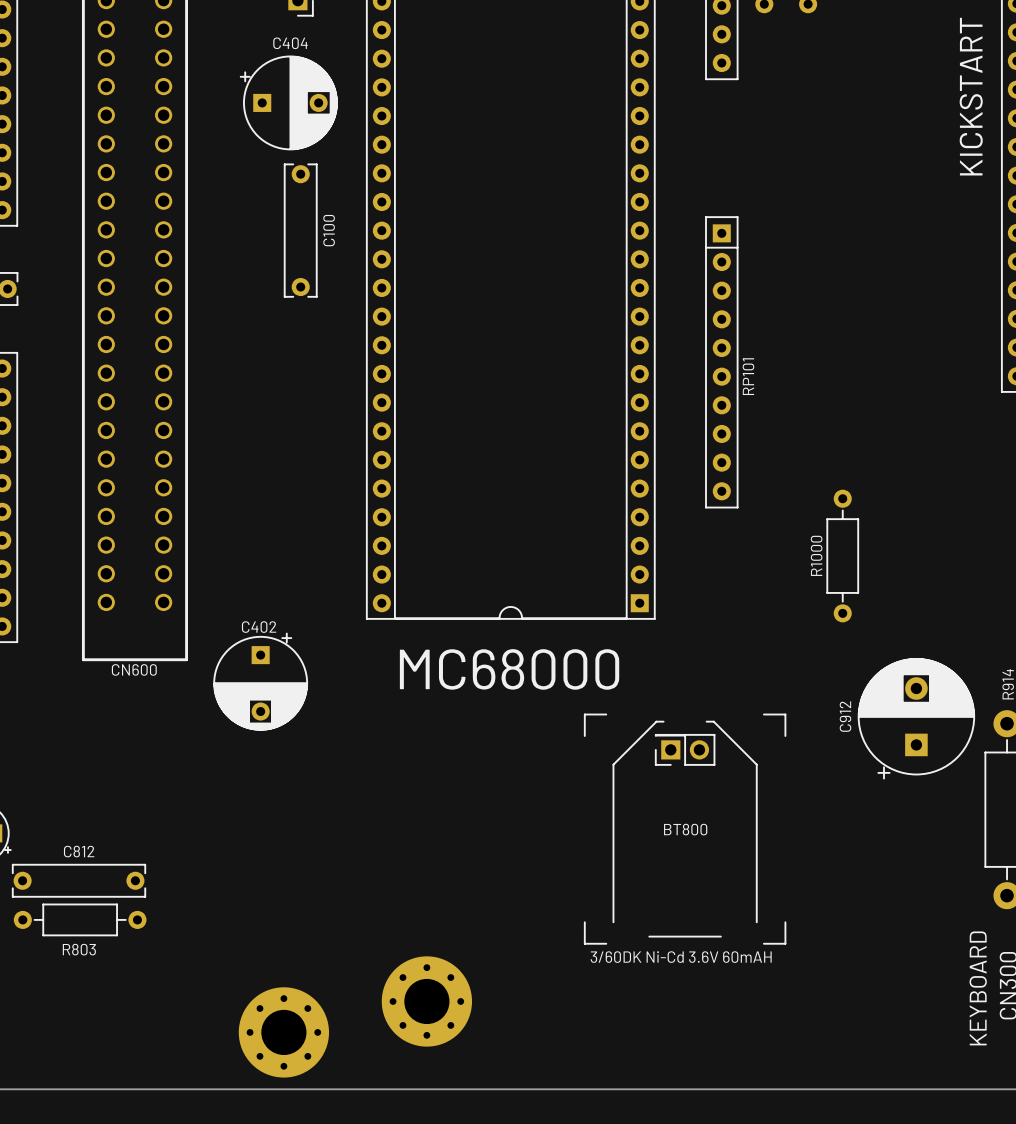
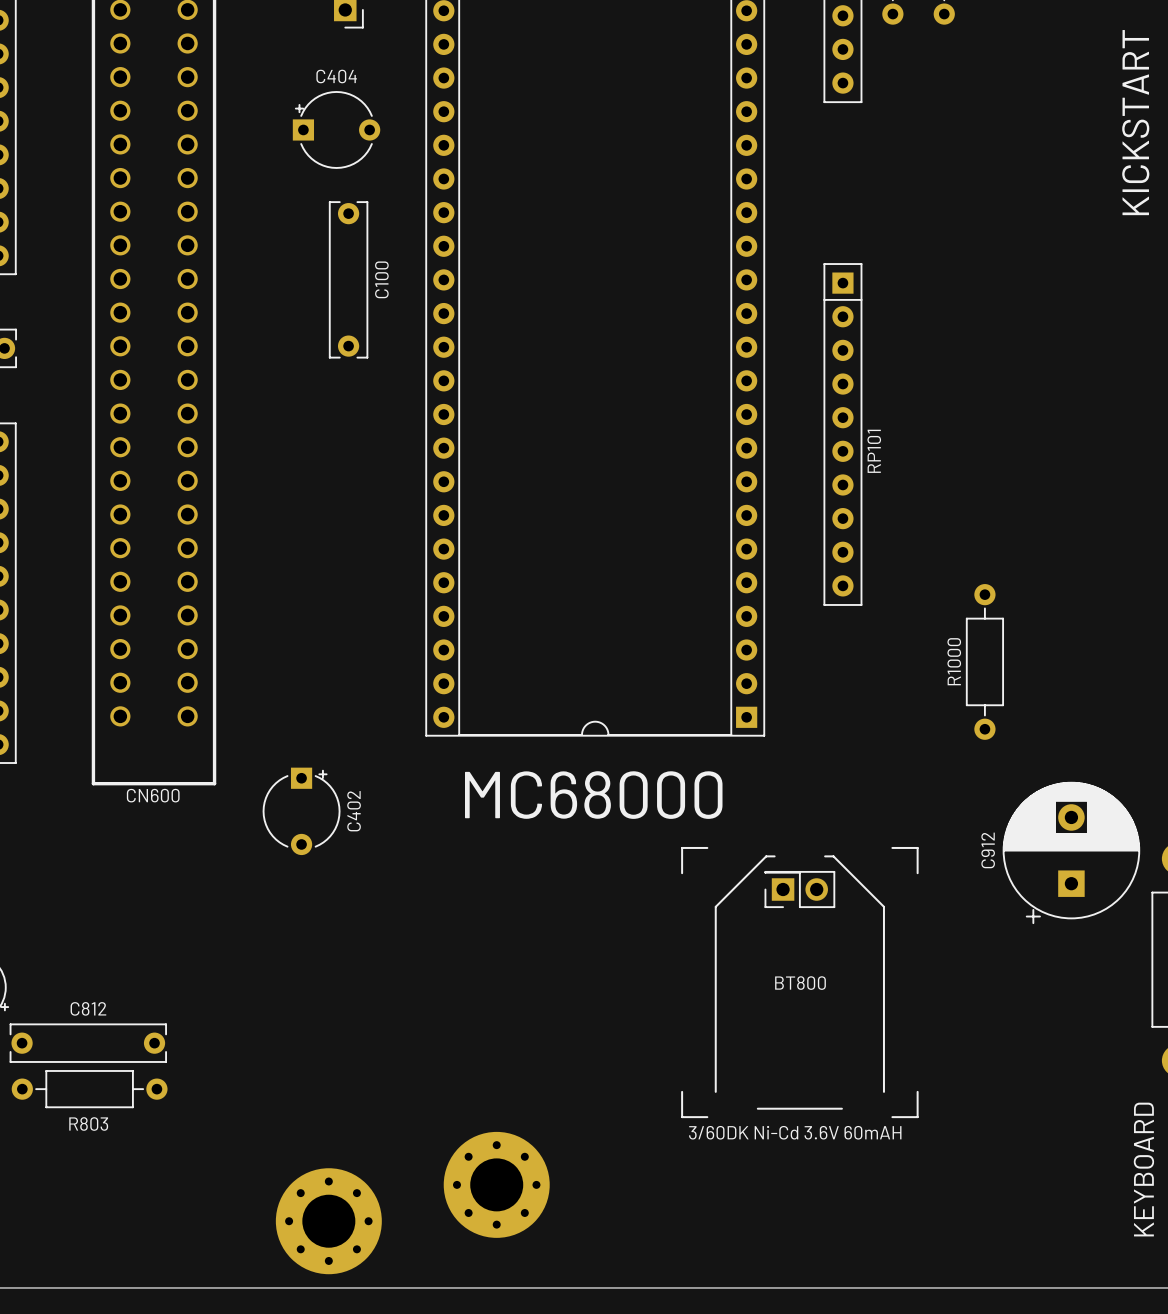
C404 footprint: [240, 55, 338, 151] -> [292, 91, 381, 169]
C402 name position: C402 (259, 627) -> C402 (354, 811)
C402 footprint: [213, 632, 308, 731] -> [262, 767, 341, 856]

